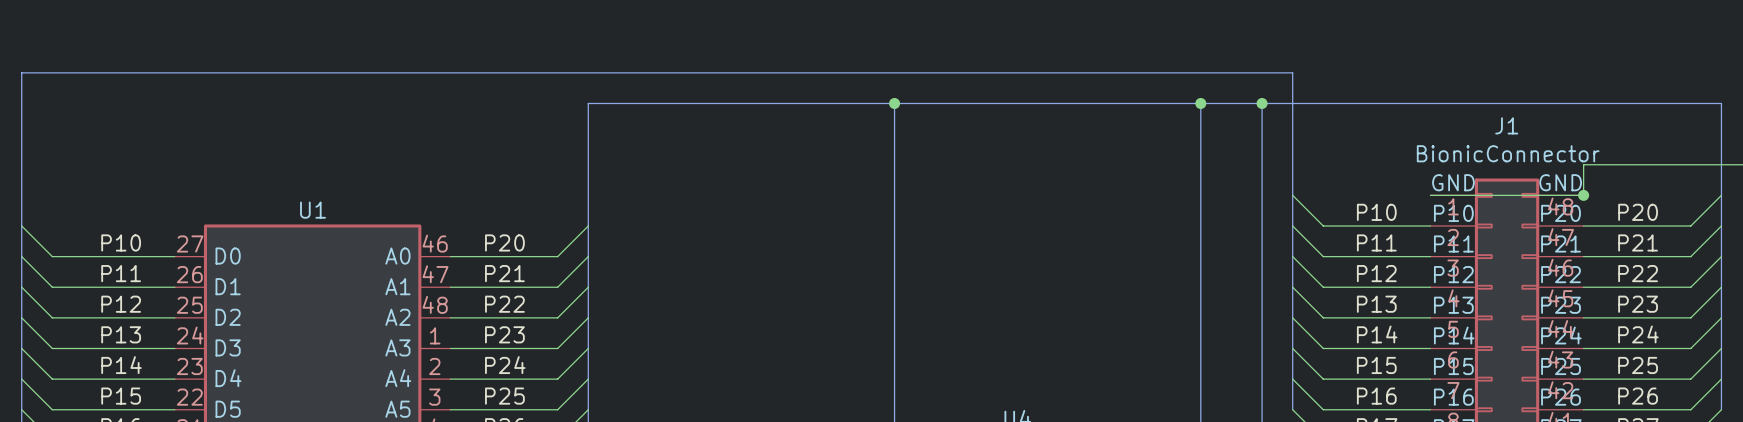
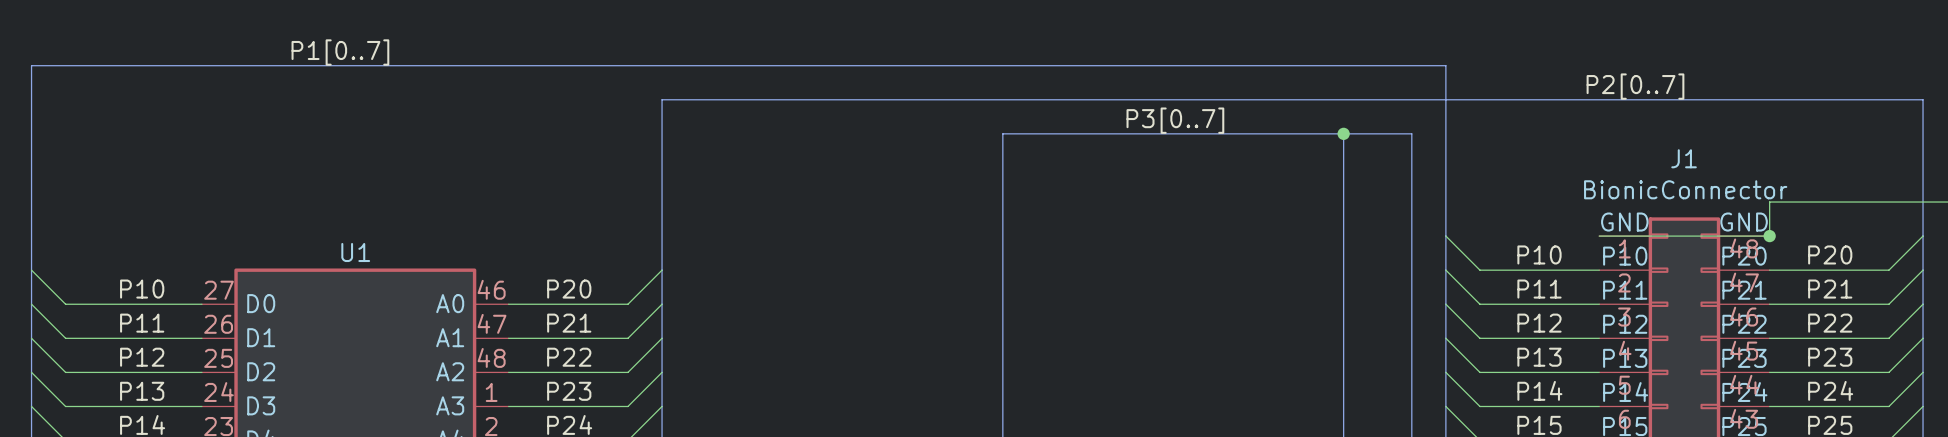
label: none -> P1[0..7] (340, 52)
label: none -> P2[0..7] (1635, 86)
bus: (21, 72) (588, 72) -> (31, 99) (31, 65) (1445, 65) (1445, 99) (1923, 99) (1923, 133)
label: none -> P3[0..7] (1175, 120)
bus: (588, 103) (894, 103) -> (662, 133) (662, 99)
junction: (894, 103) -> none
bus: (1262, 103) (1721, 103) -> none
junction: (1262, 103) -> none

